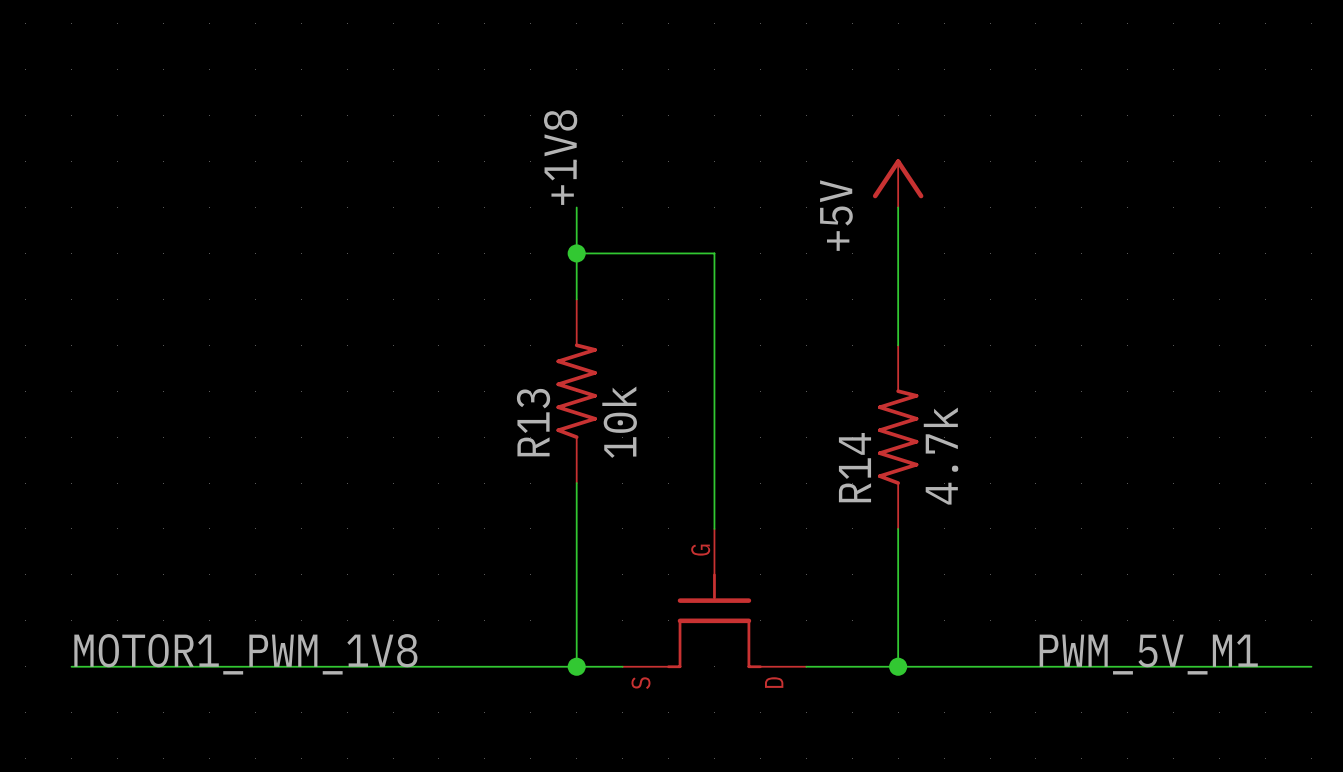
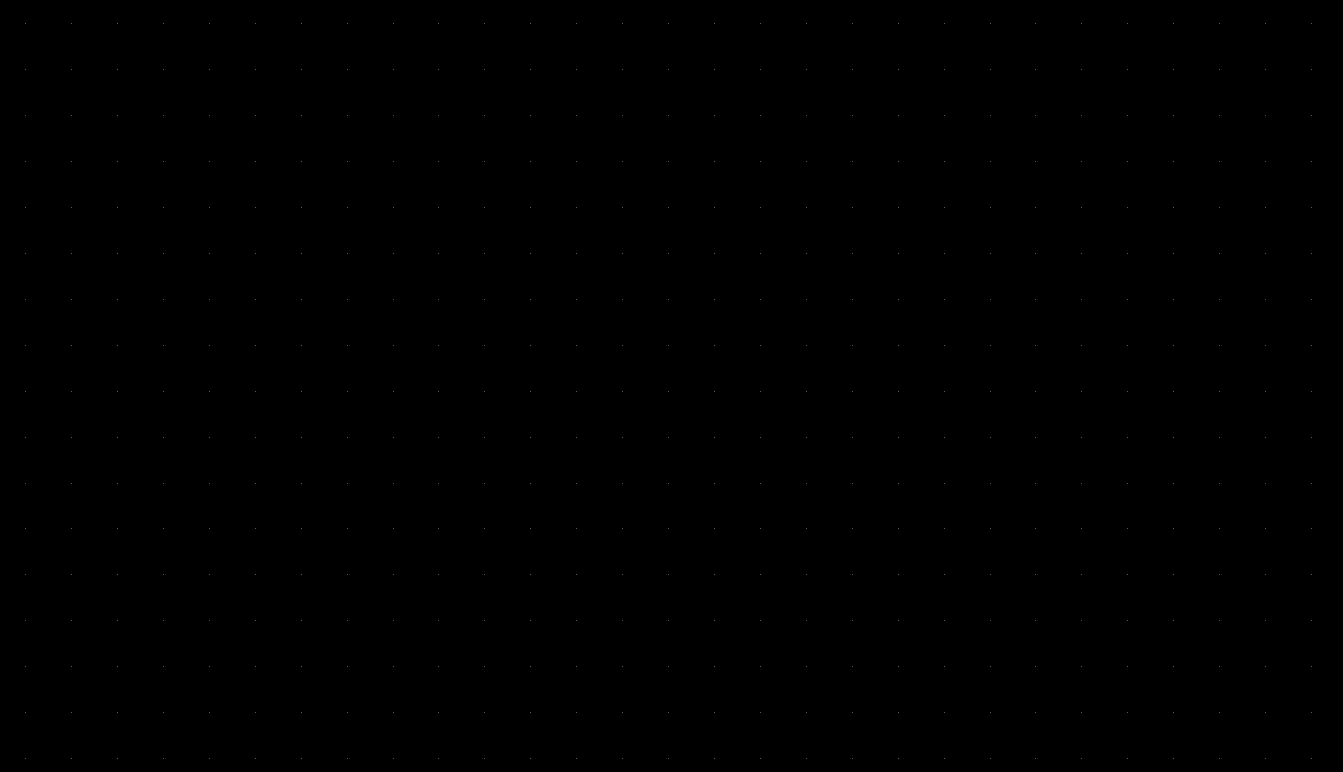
label: +1V8 (560, 157) -> none
power symbol: +5V (898, 183) -> none
wire: (576, 207) (576, 299) -> none
wire: (898, 207) (898, 345) -> none
wire: (576, 253) (714, 253) (714, 528) -> none
junction: (576, 253) -> none
R13: 10k (576, 391) -> none
R14: 4.7k (898, 437) -> none
wire: (576, 483) (576, 666) -> none
wire: (898, 528) (898, 666) -> none
part: (714, 598) -> none
label: MOTOR1_PWM_1V8 (245, 654) -> none
label: PWM_5V_M1 (1148, 654) -> none
wire: (71, 666) (622, 666) -> none
junction: (576, 666) -> none
wire: (806, 666) (1311, 666) -> none
junction: (898, 666) -> none

